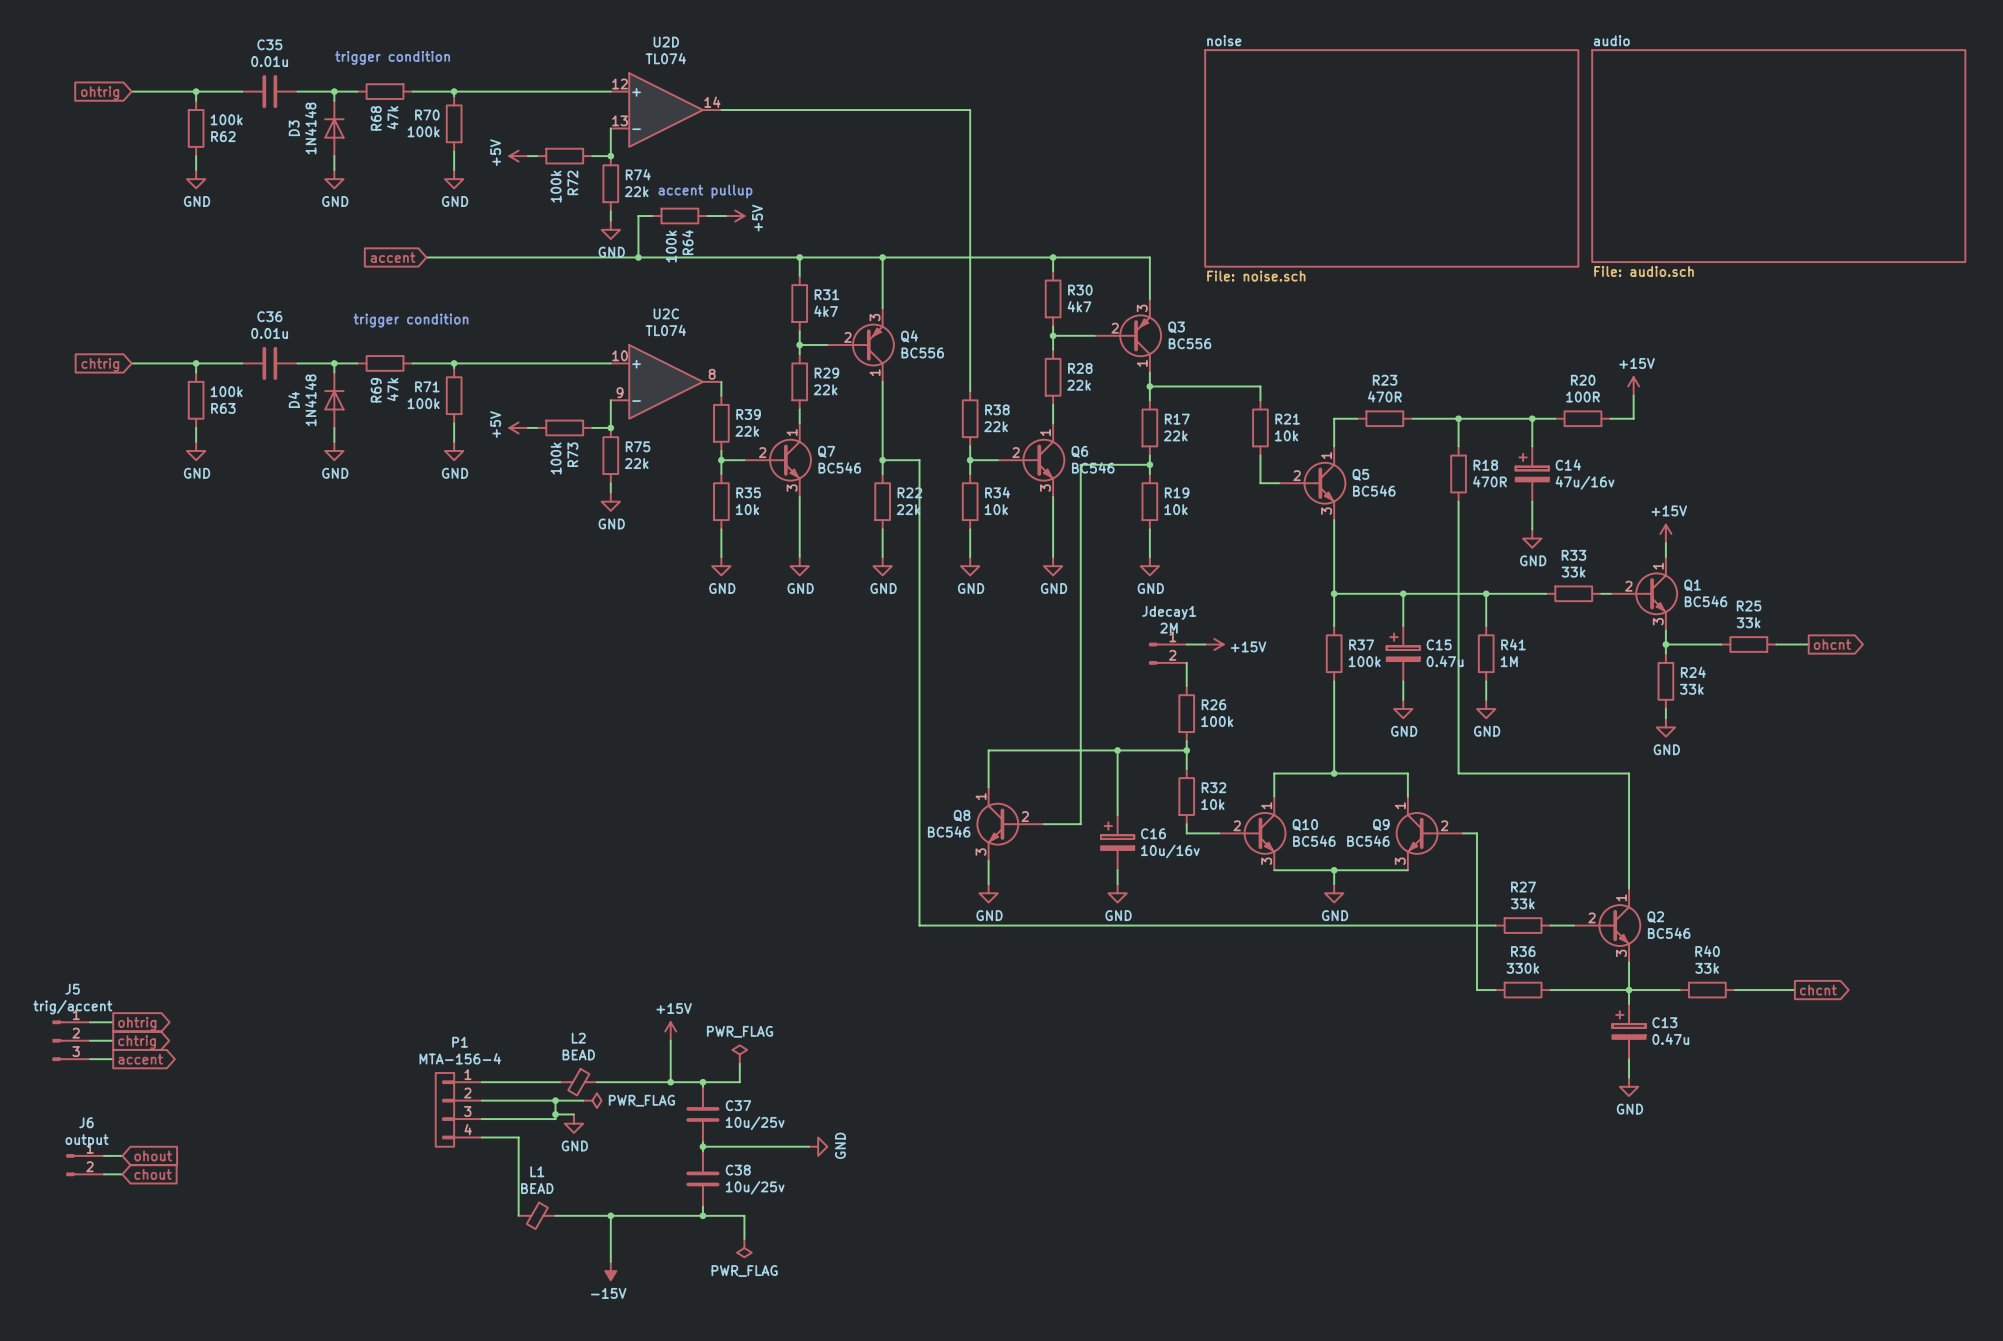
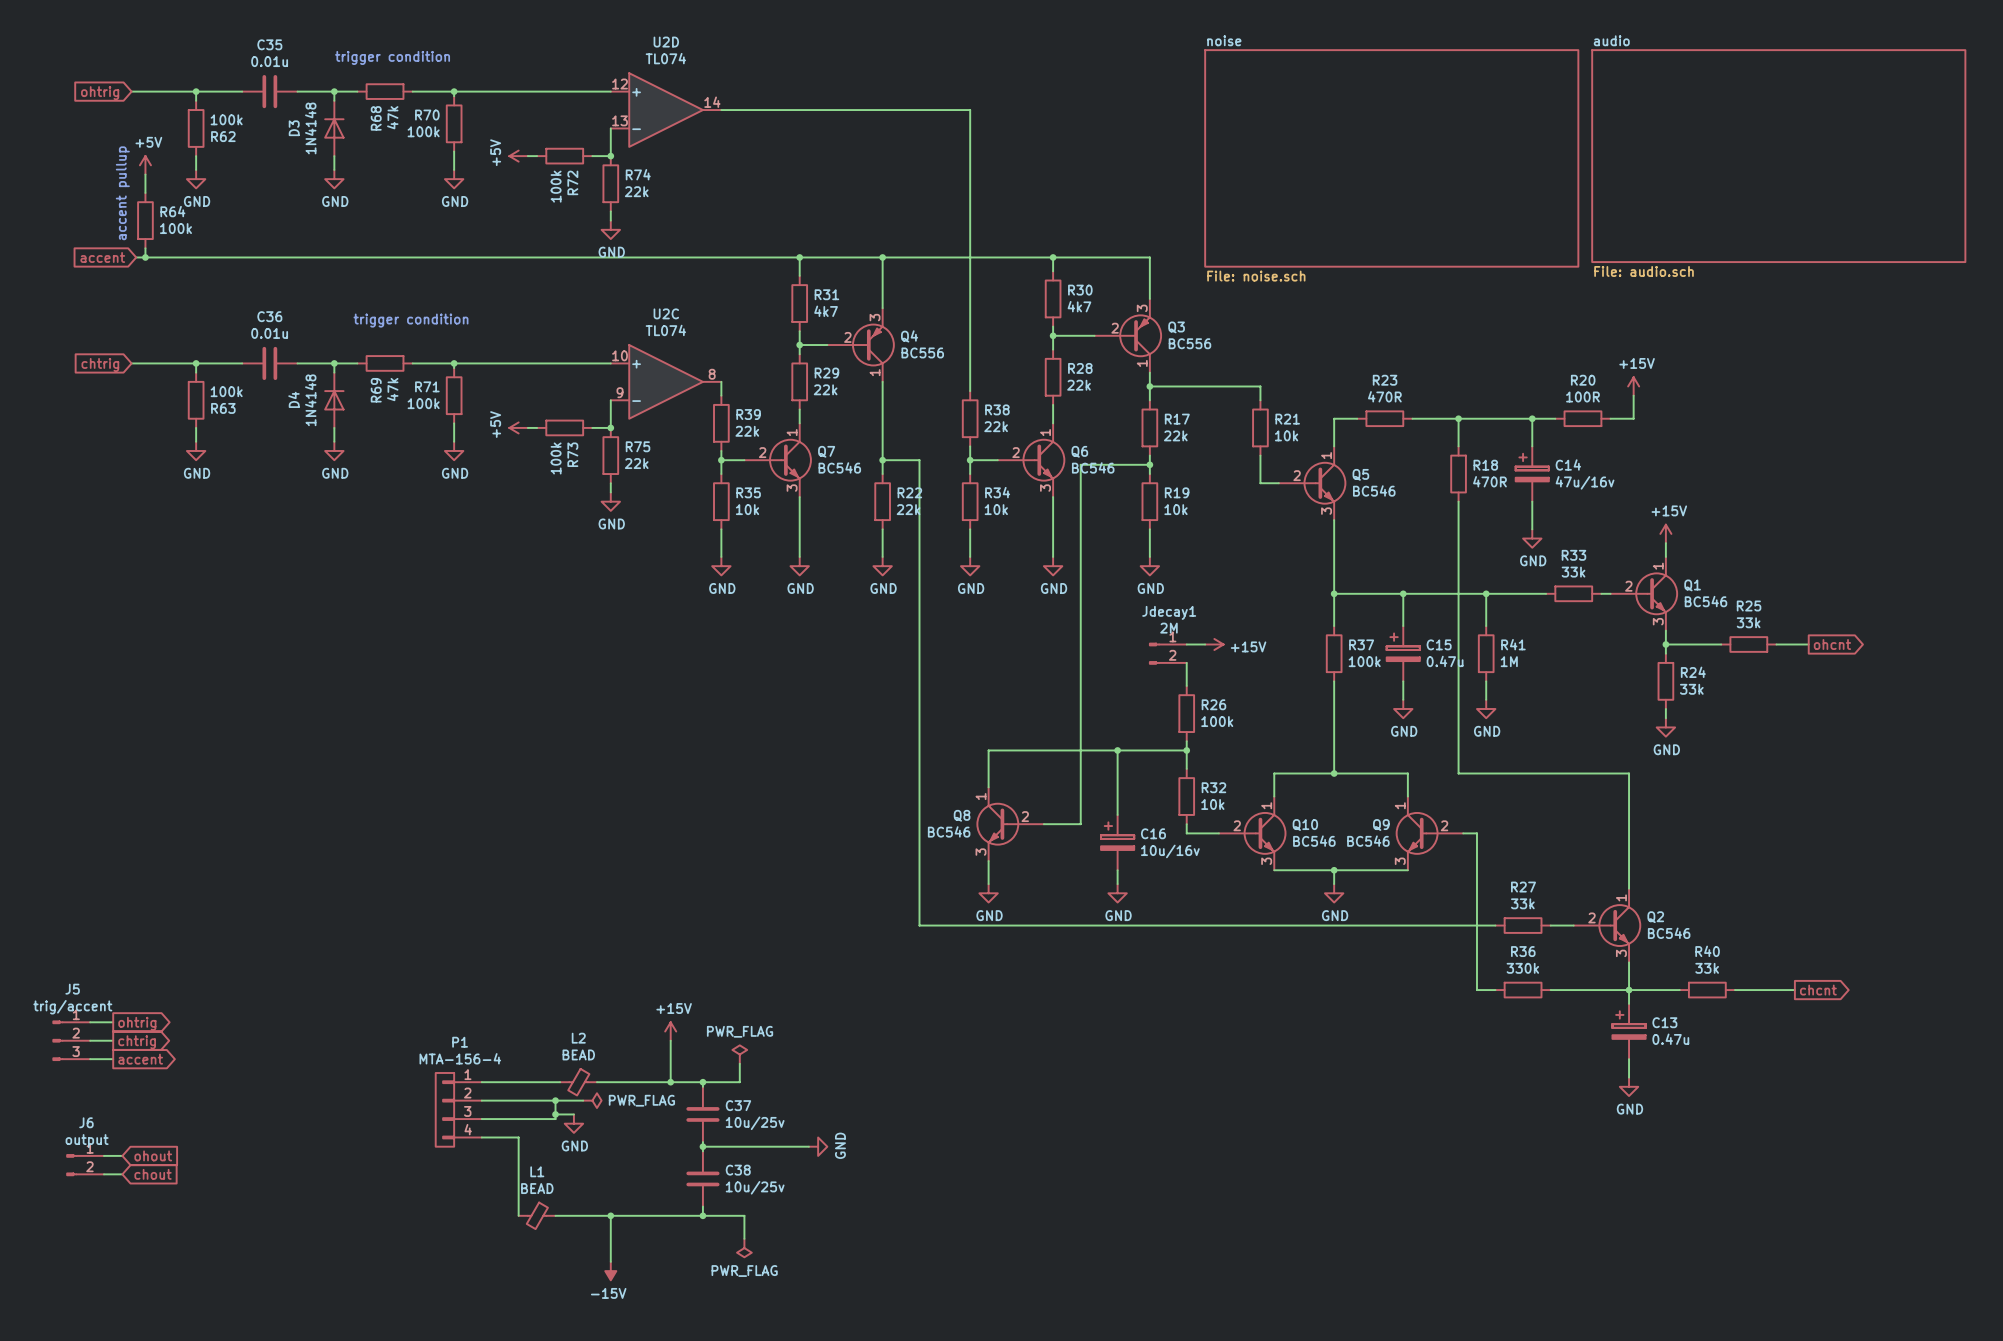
power symbol: none -> +5V (145, 165)
wire: none -> (145, 174) (145, 192)
text: accent pullup (705, 191) -> none
text: none -> accent pullup (122, 193)
wire: (652, 216) (638, 216) (638, 257) -> none
R64 rotation: 0° (679, 216) -> 90° clockwise (145, 220)
R64 position: (679, 216) -> (145, 220)
wire: (707, 216) (725, 216) -> none
power symbol: +5V (735, 216) -> none
R64 name position: R64 (687, 242) -> R64 (172, 211)
R64 value position: 100k (671, 246) -> 100k (175, 228)
wire: none -> (145, 248) (145, 257)
global label: none -> accent (102, 257)
wire: none -> (136, 257) (426, 257)
junction: none -> (145, 257)
global label: accent (393, 257) -> none
junction: (638, 257) -> none

